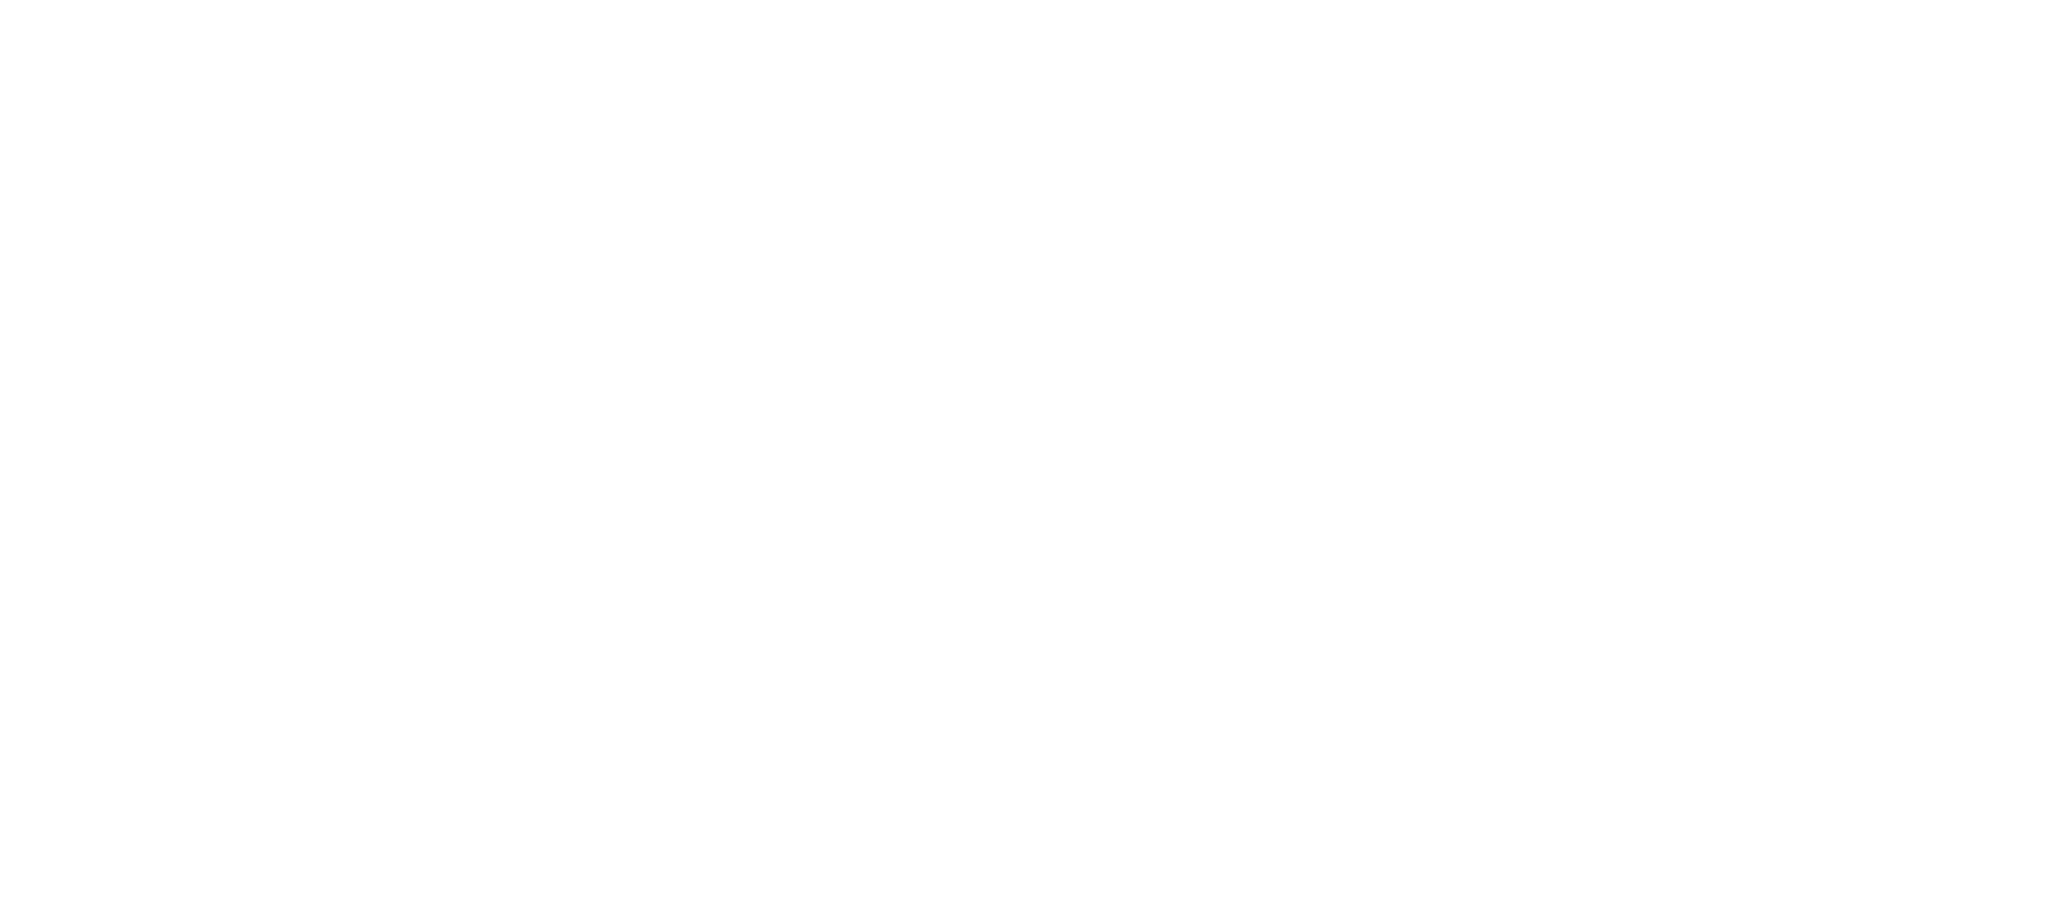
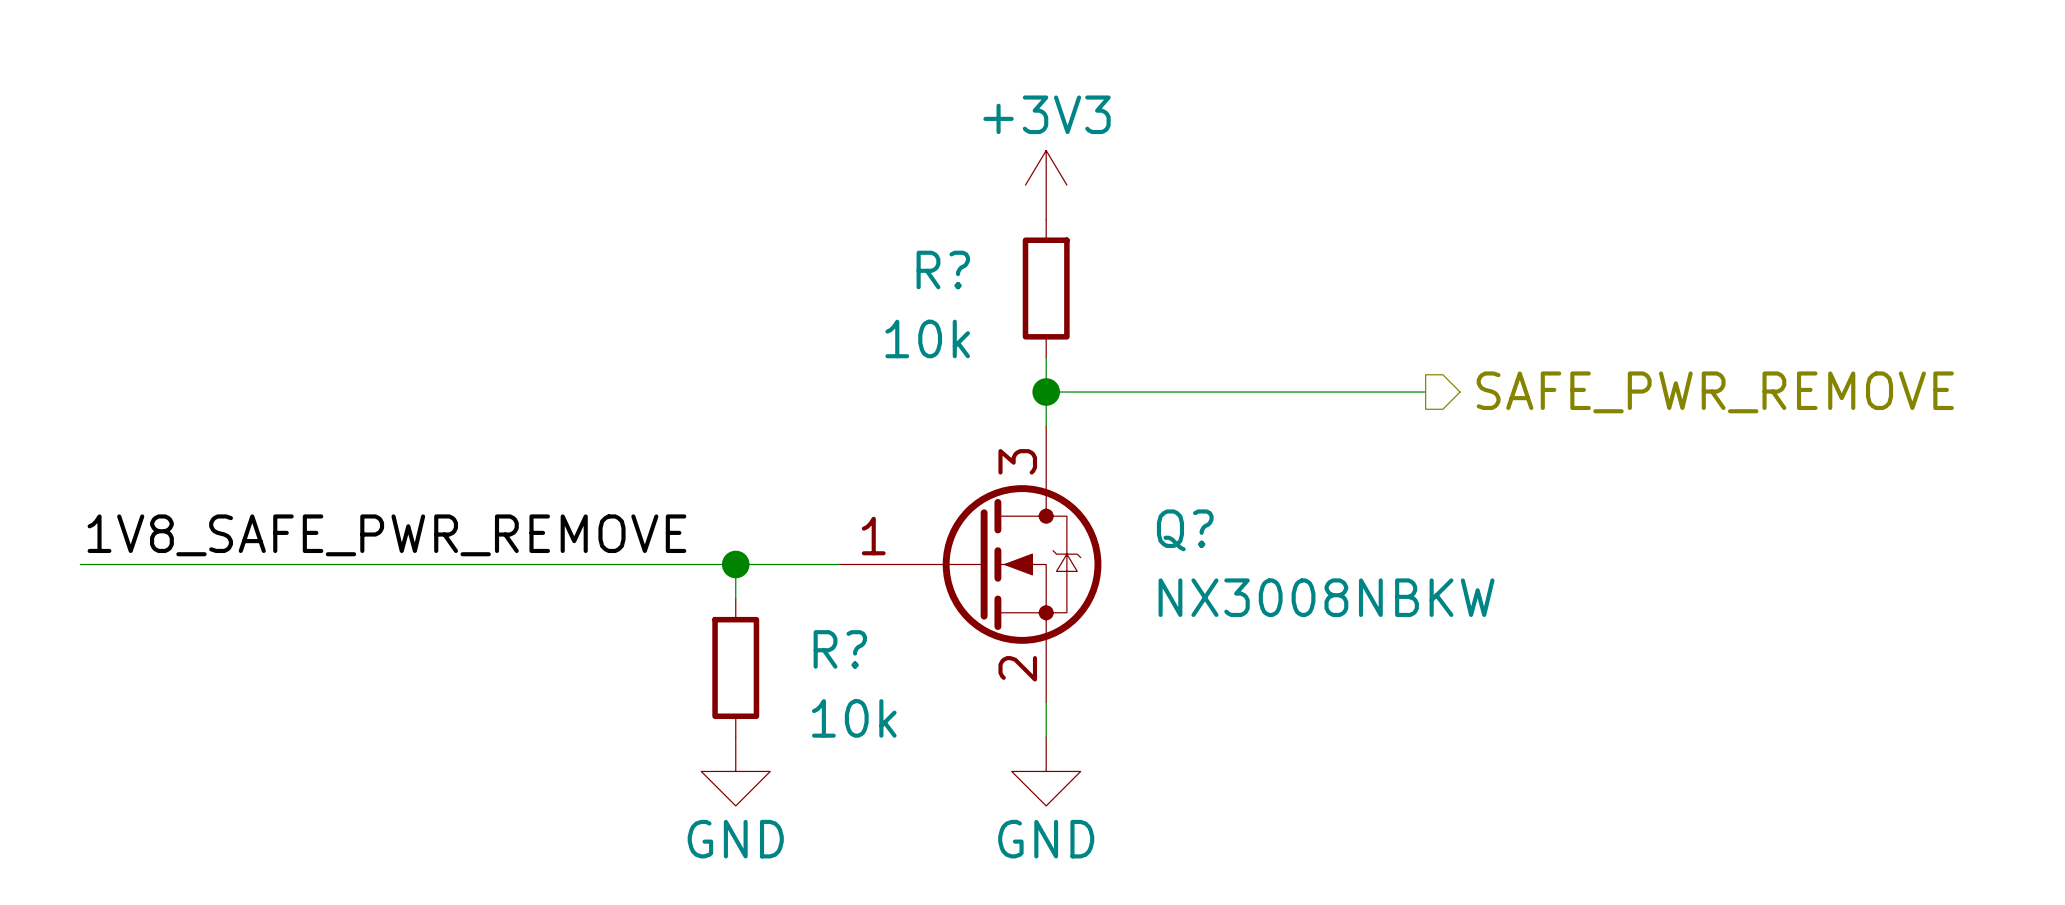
power symbol: none -> +3V3 (1046, 185)
R?: none -> 10k (1046, 288)
wire: none -> (1046, 357) (1046, 426)
wire: none -> (1046, 392) (1425, 392)
junction: none -> (1046, 392)
hierarchical label: none -> SAFE_PWR_REMOVE (1715, 392)
label: none -> 1V8_SAFE_PWR_REMOVE (386, 535)
wire: none -> (80, 564) (839, 564)
wire: none -> (735, 564) (735, 598)
junction: none -> (735, 564)
Q?: none -> NX3008NBKW (970, 564)
R?: none -> 10k (735, 667)
wire: none -> (1046, 702) (1046, 736)
power symbol: none -> GND (735, 771)
power symbol: none -> GND (1046, 771)

